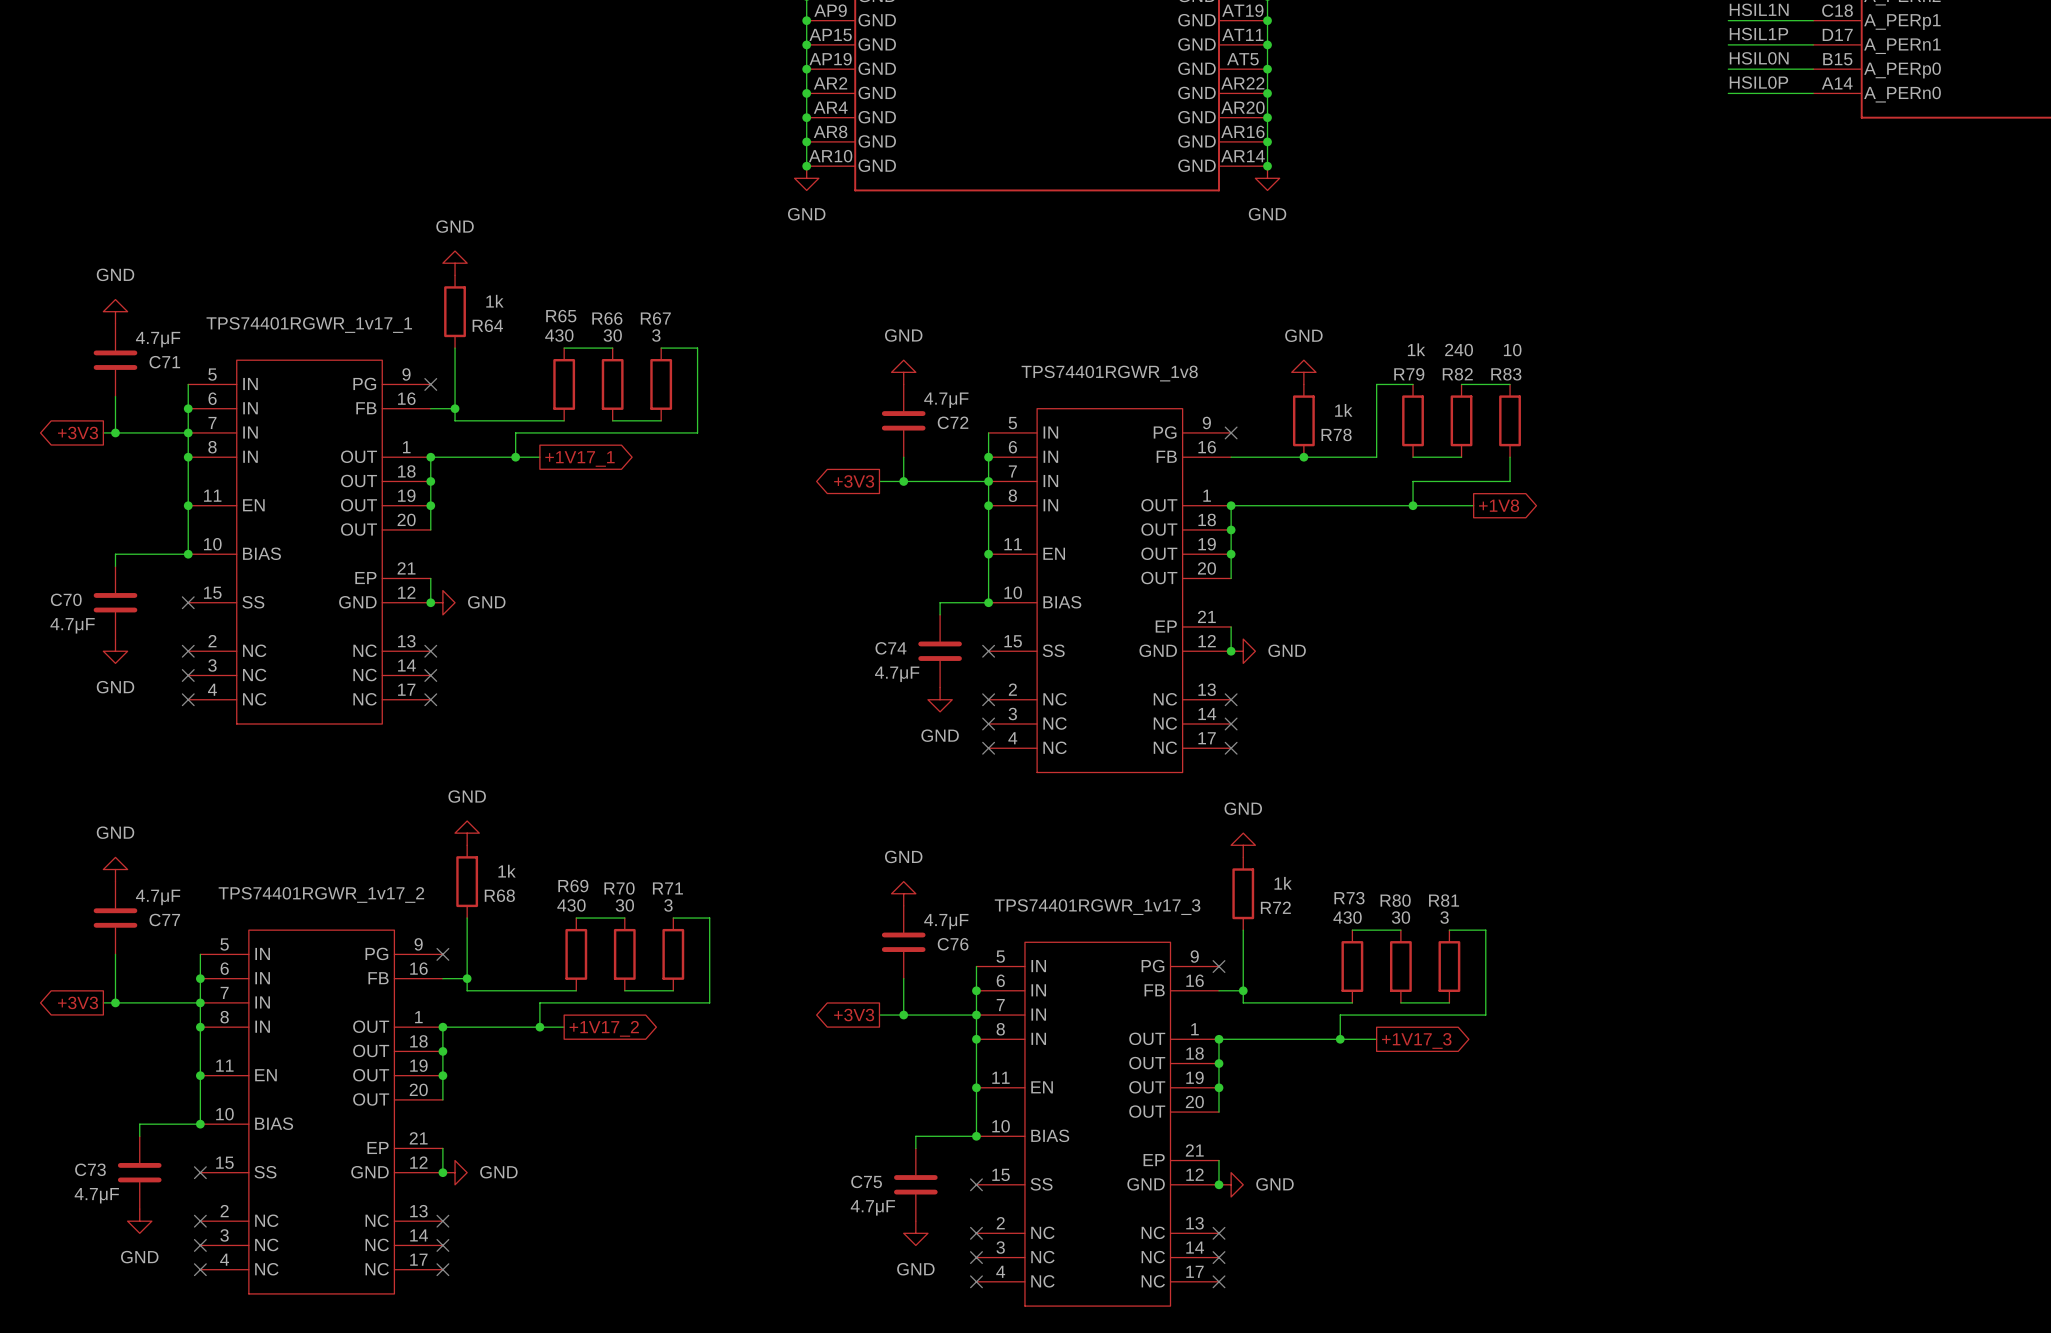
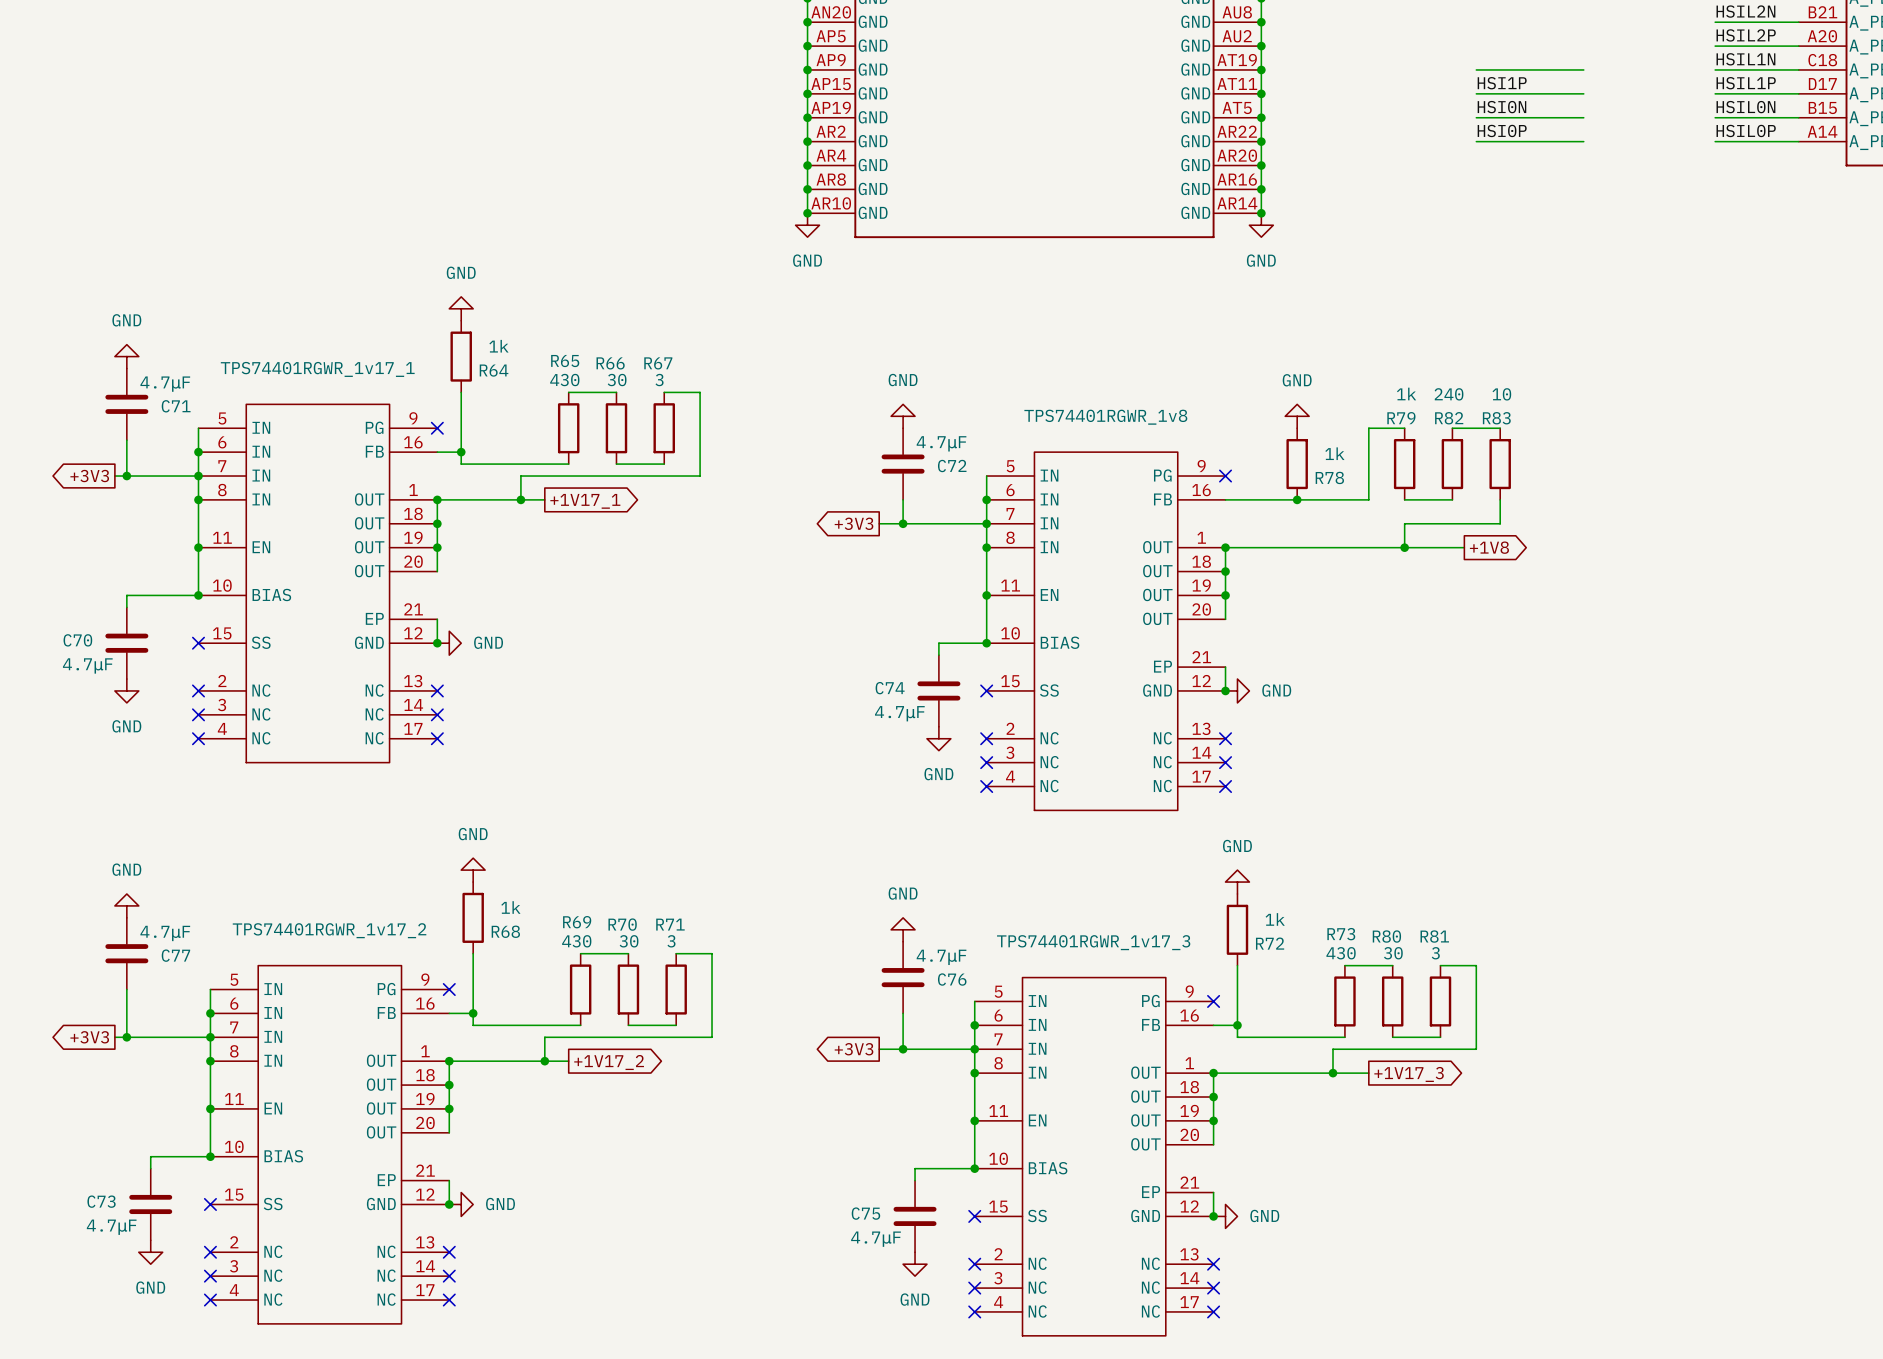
wire: none -> (1476, 69) (1583, 69)
label: none -> HSI1P (1502, 83)
wire: none -> (1476, 93) (1583, 93)
label: none -> HSI0N (1501, 107)
wire: none -> (1476, 117) (1583, 117)
label: none -> HSI0P (1502, 130)
wire: none -> (1476, 141) (1583, 141)

